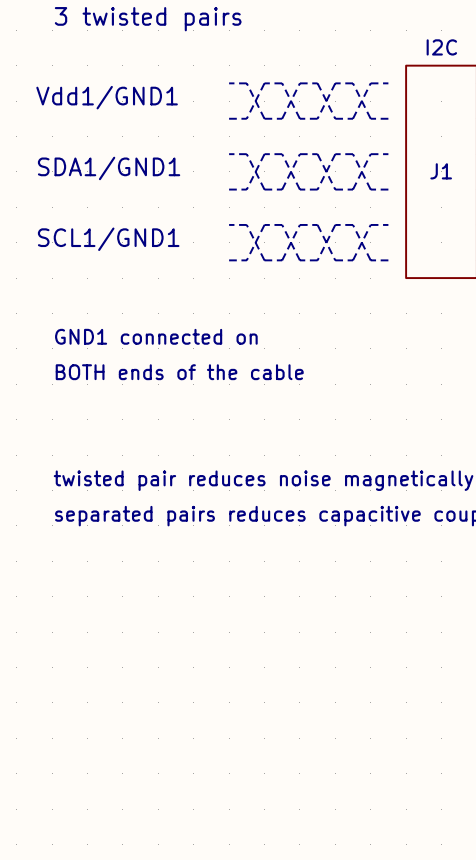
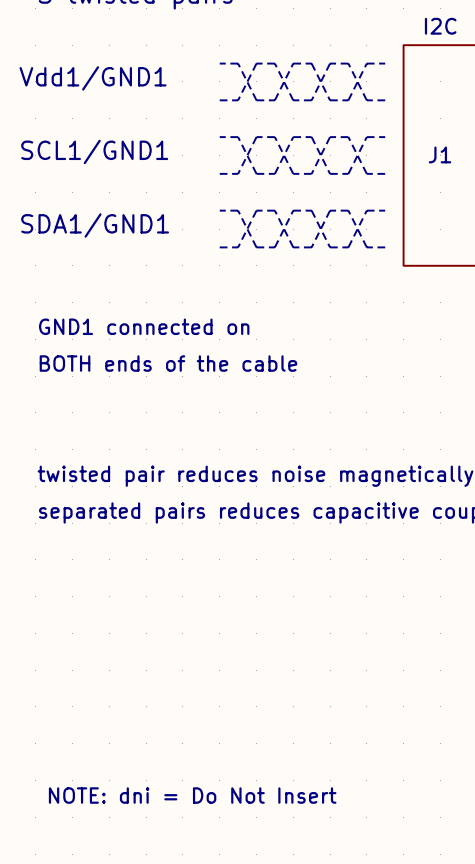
text: SDA1/GND1 (109, 168) -> SCL1/GND1 (94, 151)
text: SCL1/GND1 (108, 239) -> SDA1/GND1 (95, 225)
text: none -> NOTE: dni = Do Not Insert (192, 795)

